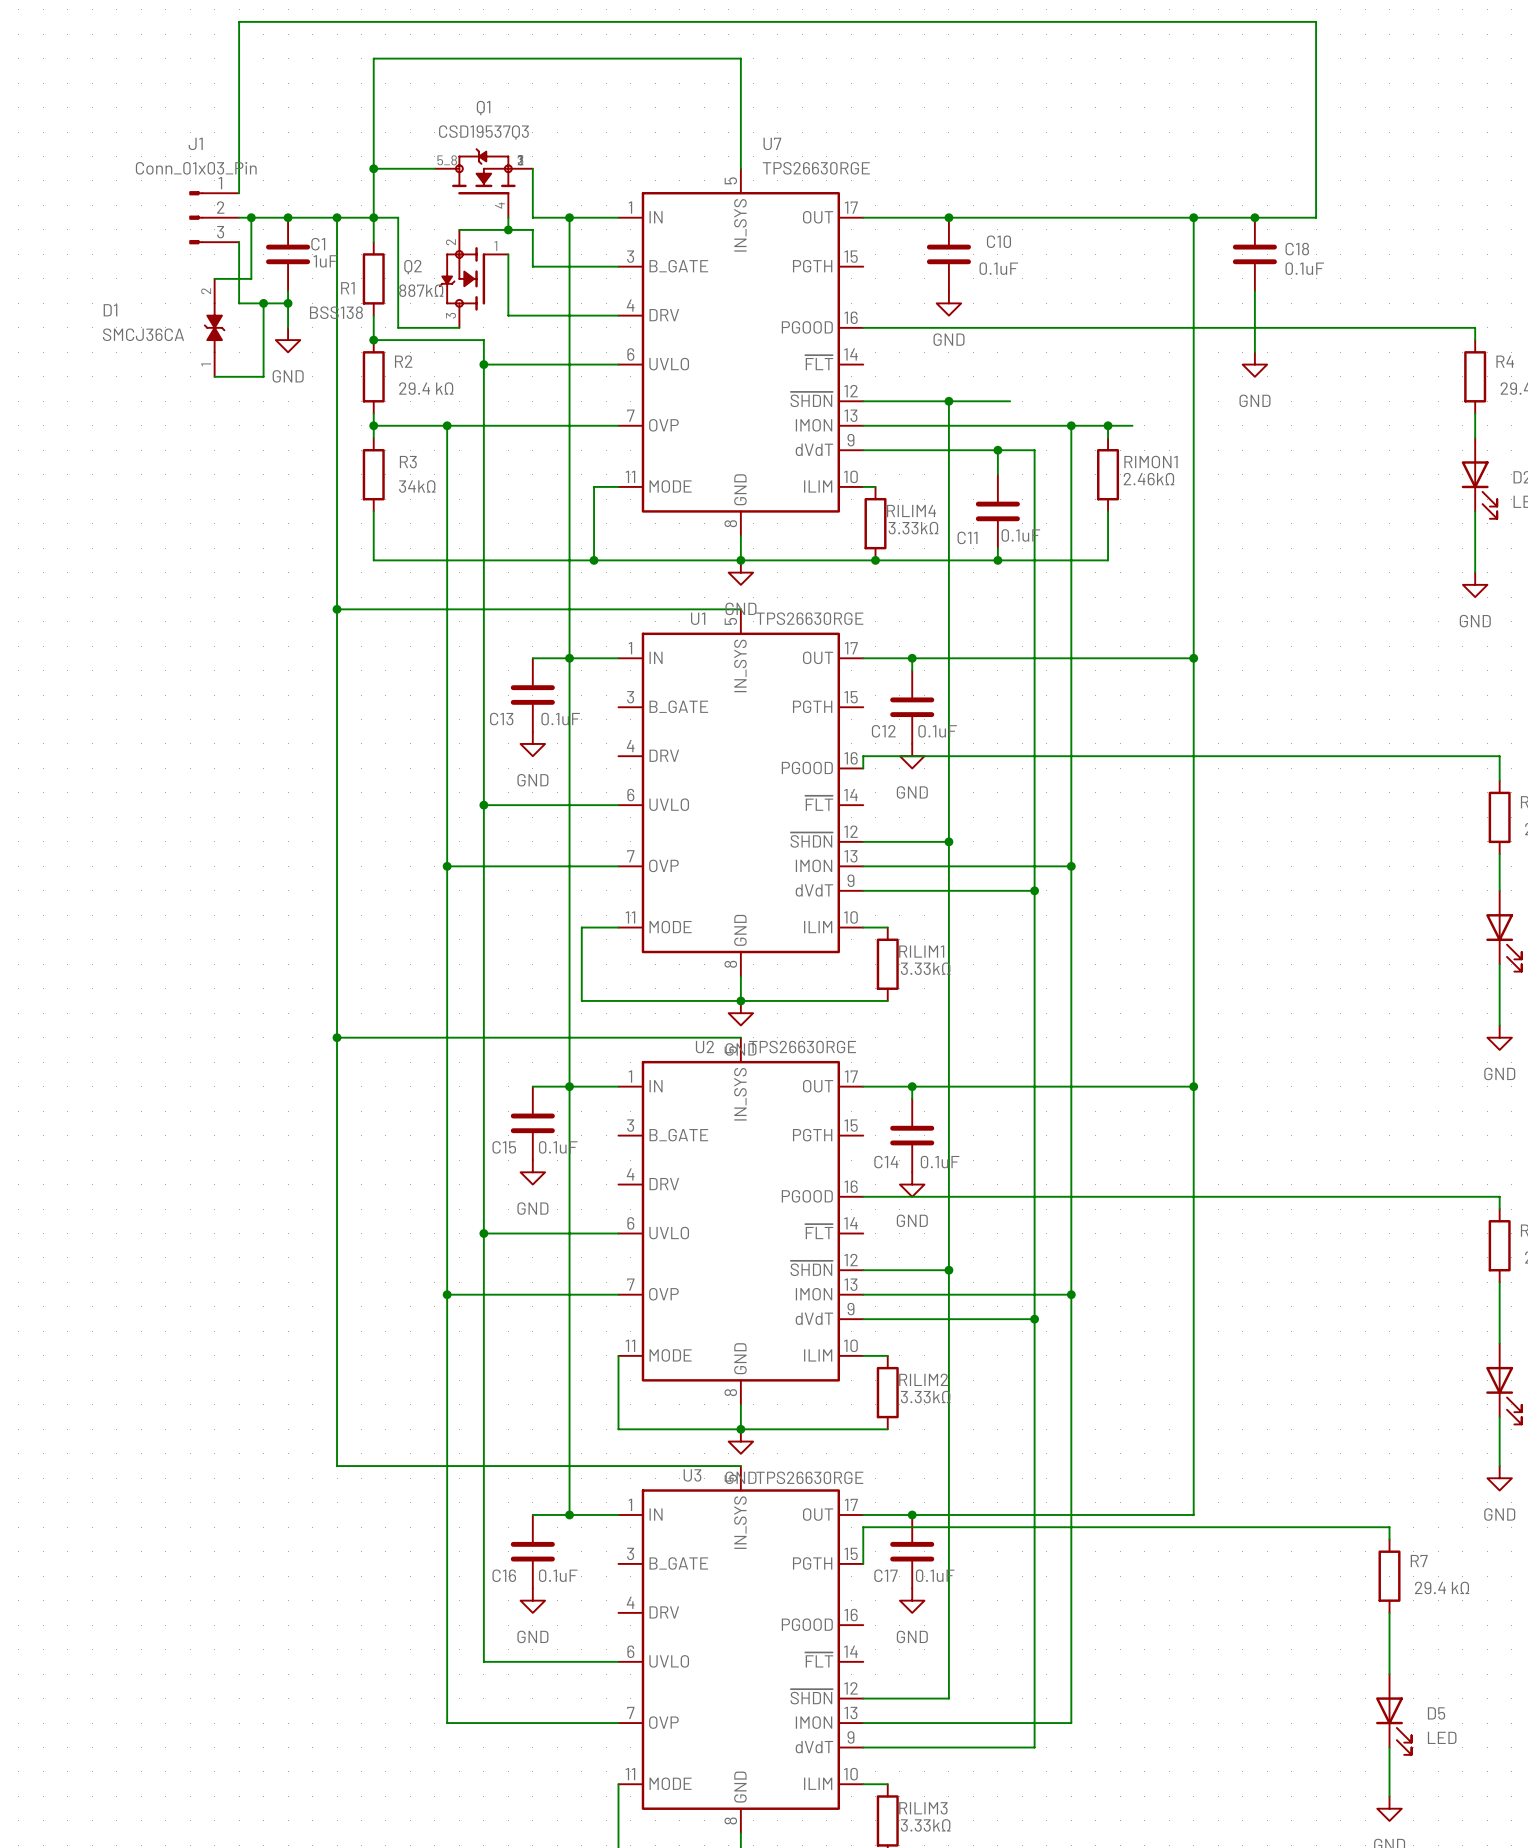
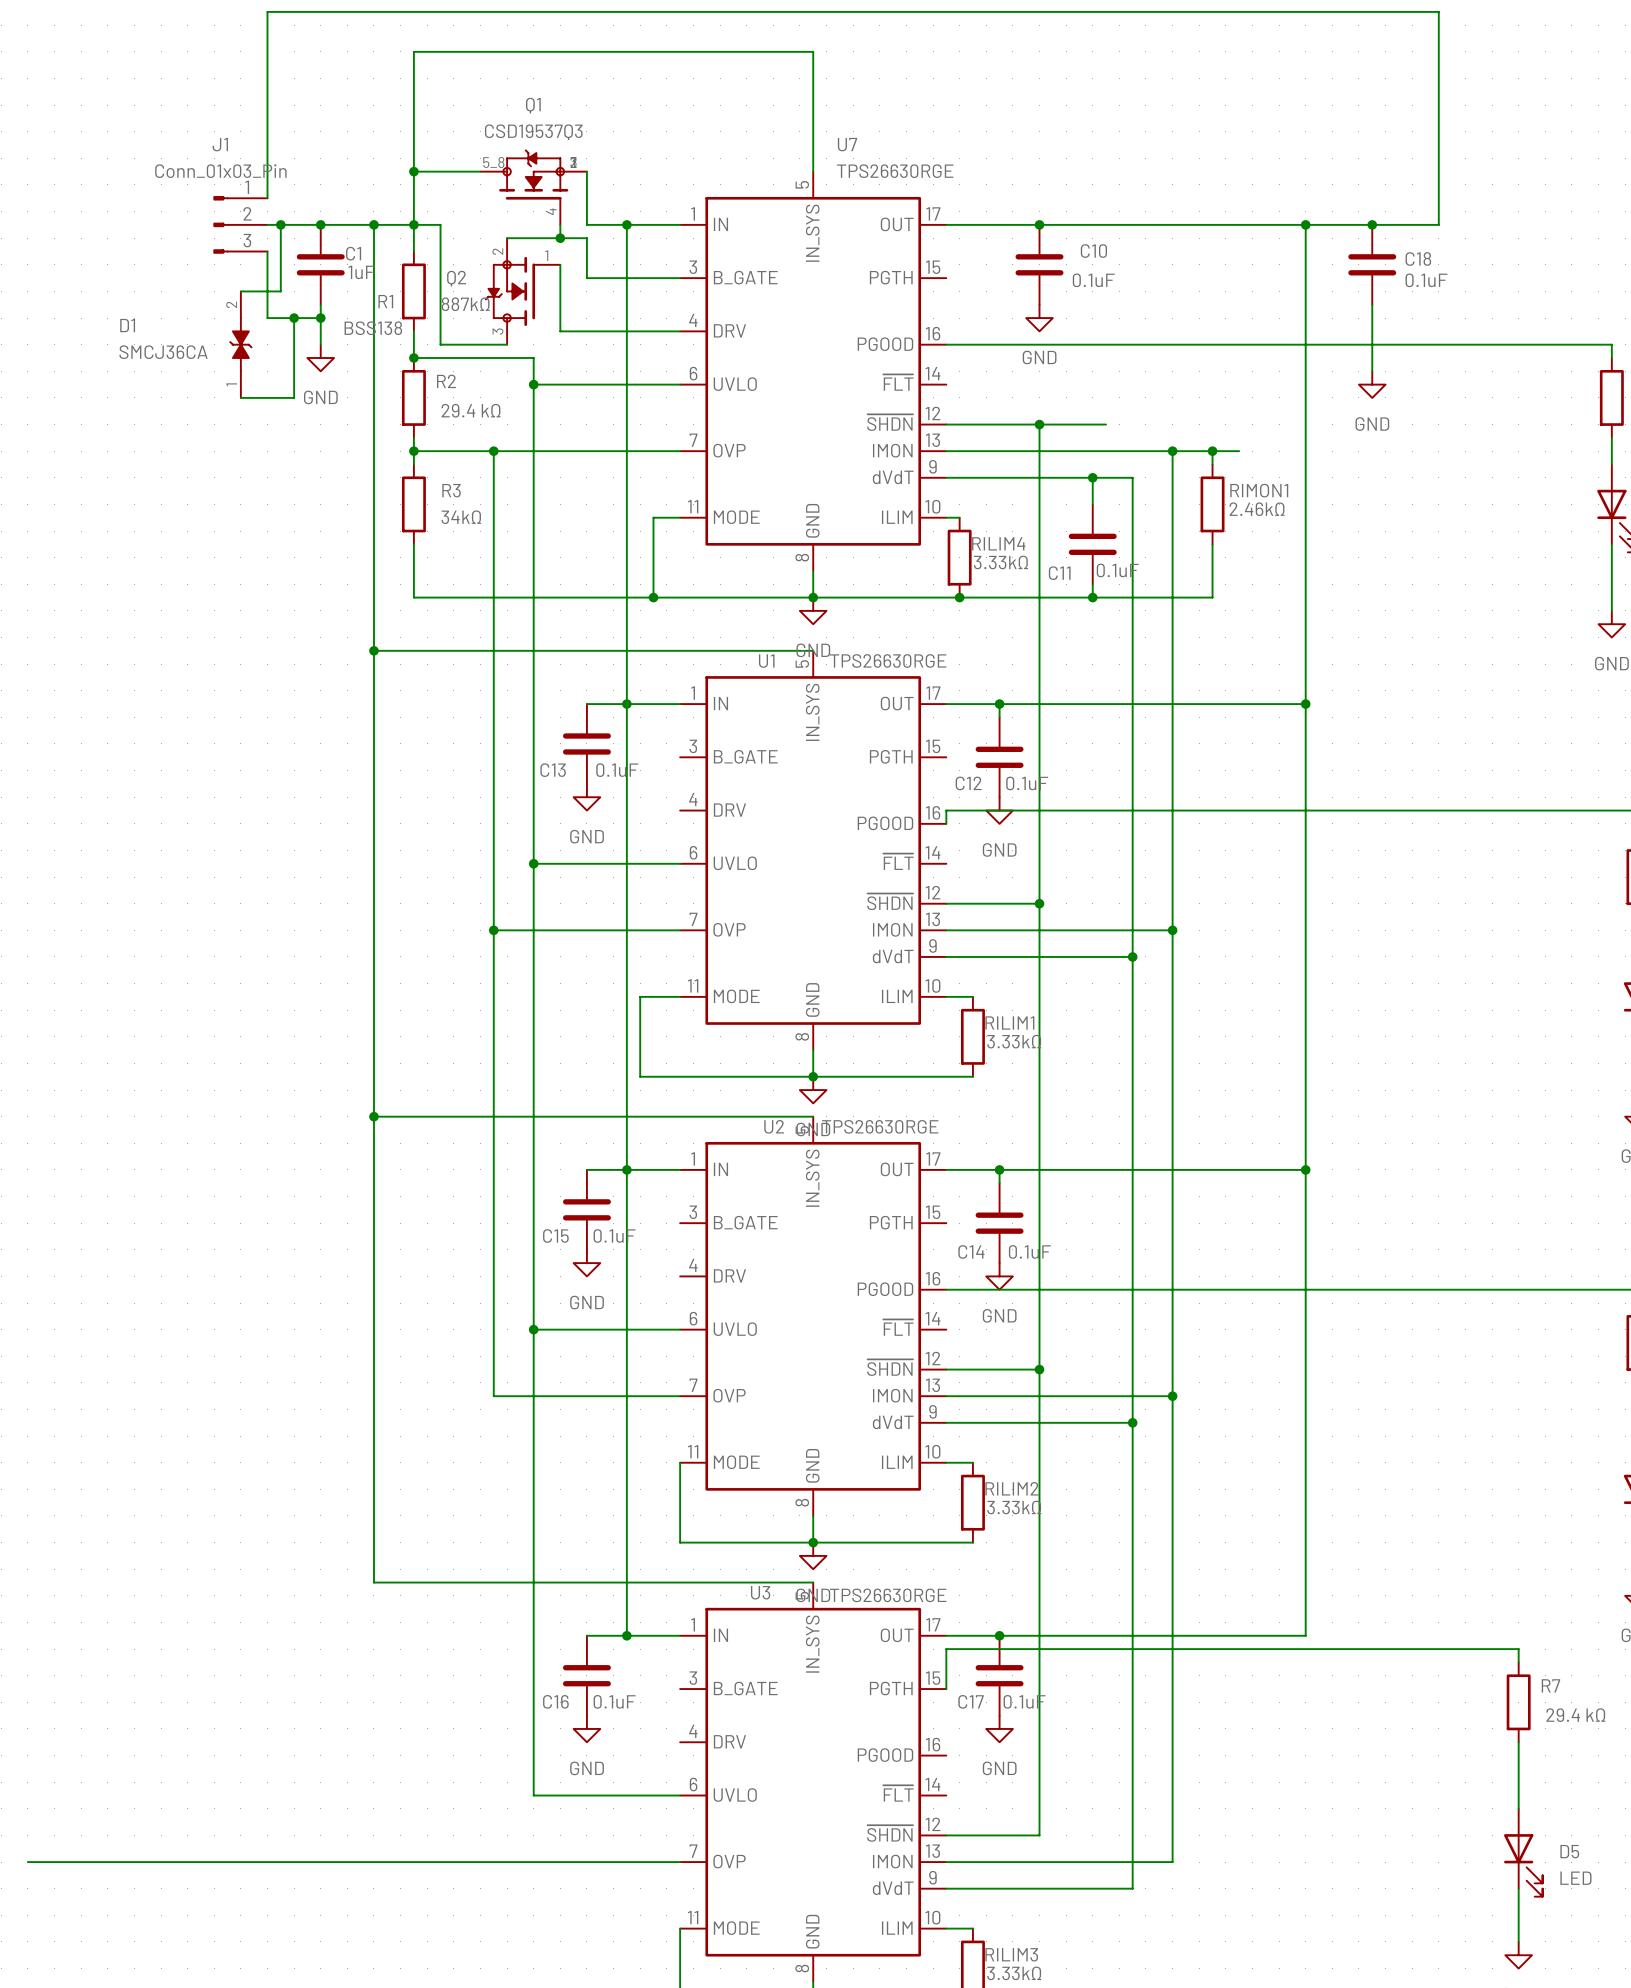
wire: (447, 1294) (447, 1723) -> (27, 1862) (493, 1862)
junction: (447, 1294) -> none

